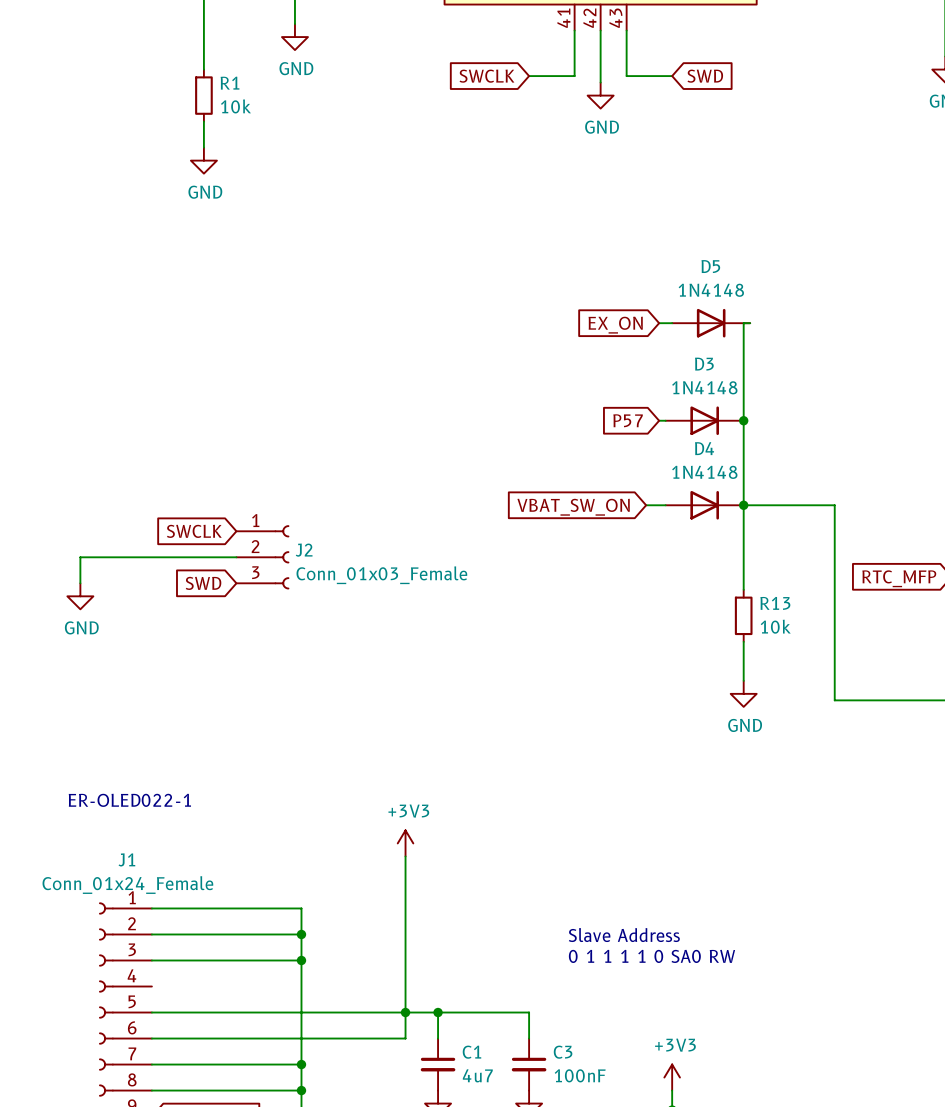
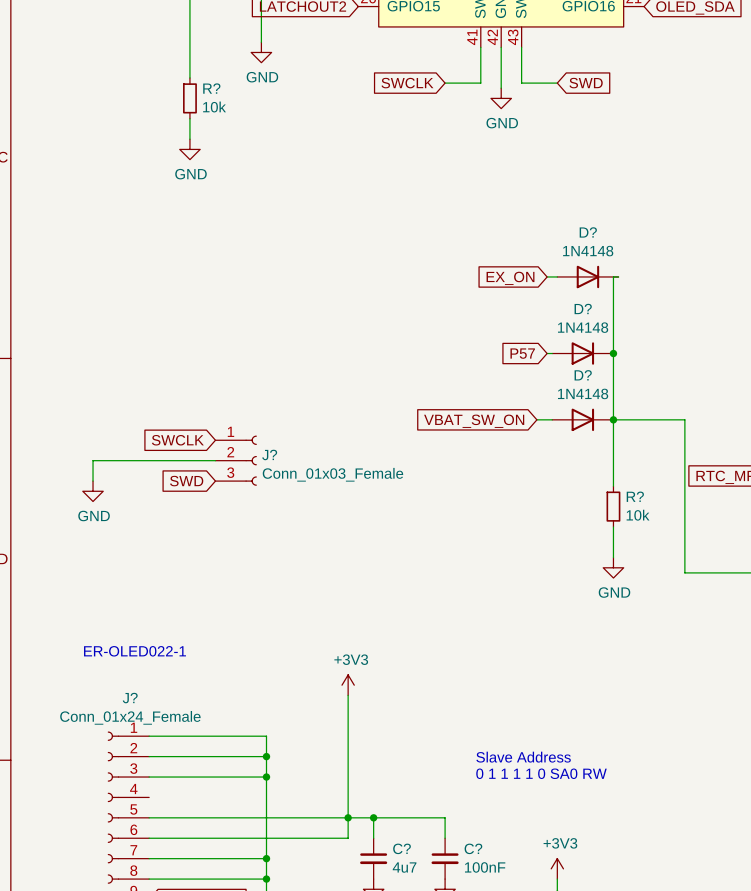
R1 name: R1 (230, 83) -> R? (211, 88)
D5 name: D5 (710, 266) -> D? (588, 232)
D3 name: D3 (704, 364) -> D? (583, 308)
D4 name: D4 (704, 448) -> D? (583, 375)
J2 name: J2 (304, 550) -> J? (269, 454)
R13 name: R13 (775, 603) -> R? (635, 496)
J1 name: J1 (126, 859) -> J? (130, 698)
C1 name: C1 (471, 1052) -> C? (402, 848)
C3 name: C3 (563, 1052) -> C? (473, 848)

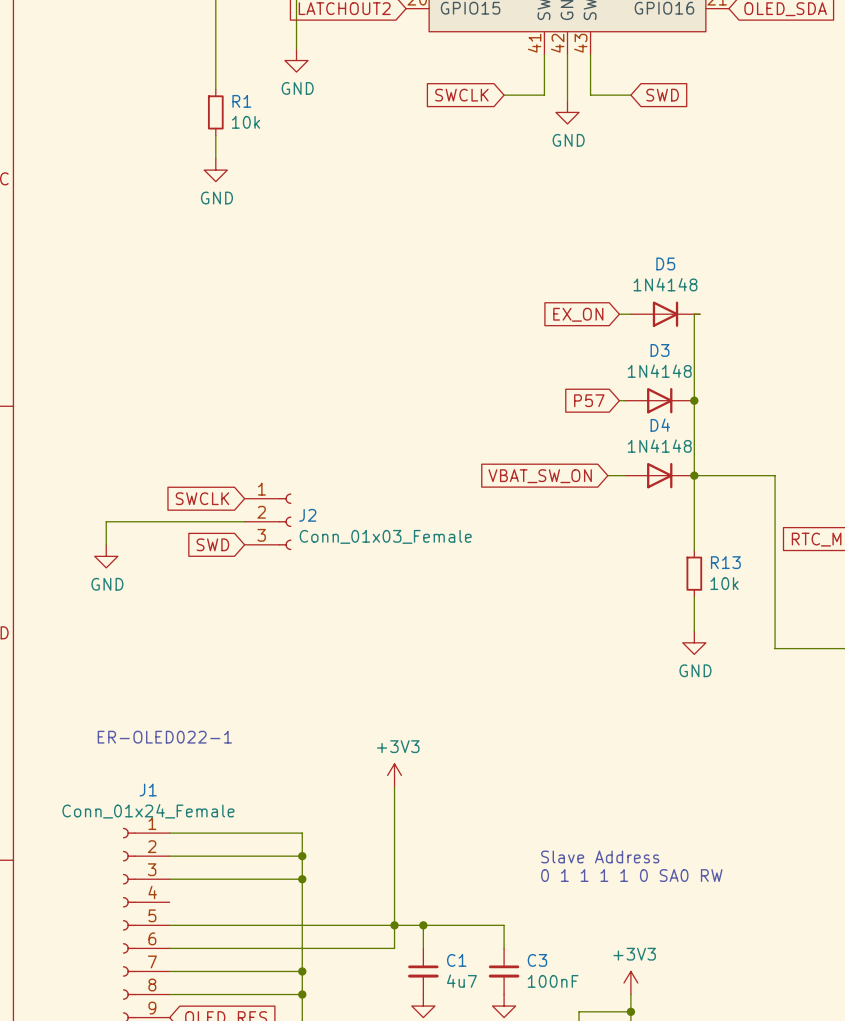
R? name: R? (211, 88) -> R1 (241, 101)
D? name: D? (588, 232) -> D5 (665, 263)
D? name: D? (583, 308) -> D3 (660, 350)
D? name: D? (583, 375) -> D4 (660, 425)
J? name: J? (269, 454) -> J2 (307, 515)
R? name: R? (635, 496) -> R13 (725, 562)
J? name: J? (130, 698) -> J1 (148, 790)
C? name: C? (402, 848) -> C1 (456, 960)
C? name: C? (473, 848) -> C3 (537, 960)

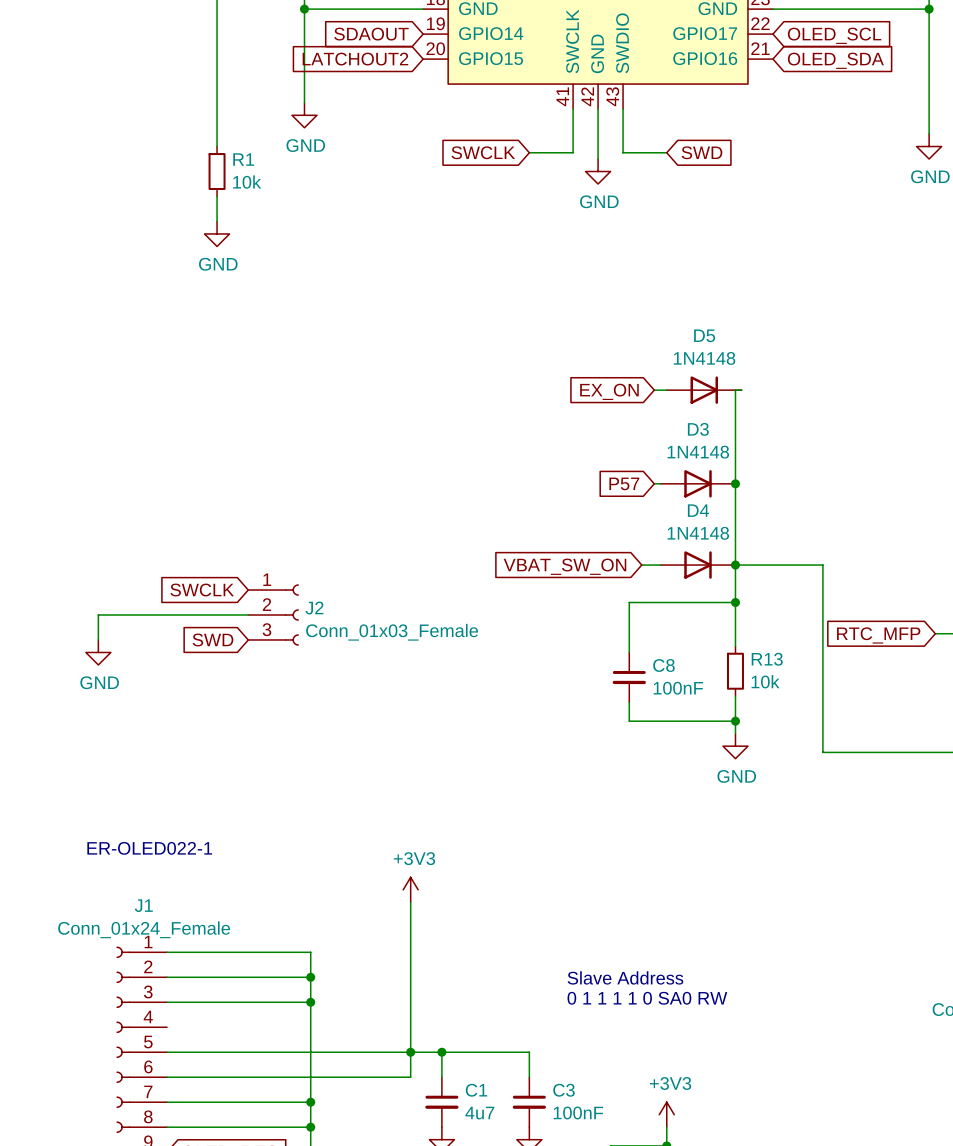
wire: none -> (735, 602) (629, 602) (629, 652)
junction: none -> (735, 602)
C8: none -> 100nF (629, 677)
wire: none -> (629, 702) (629, 721) (735, 721)
junction: none -> (735, 721)

